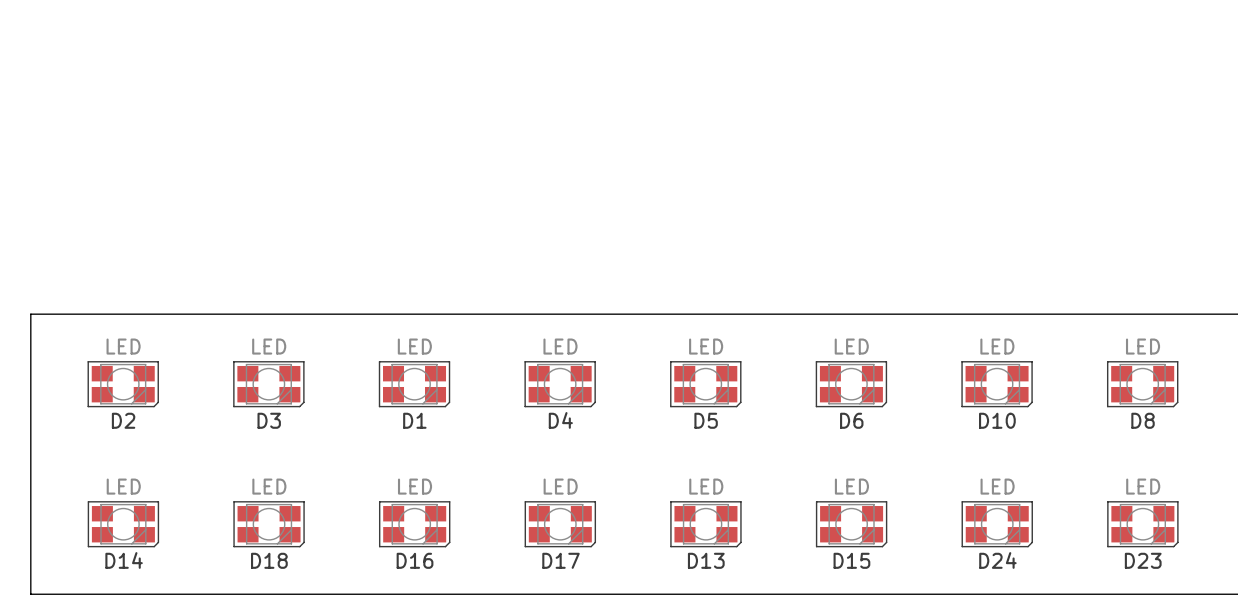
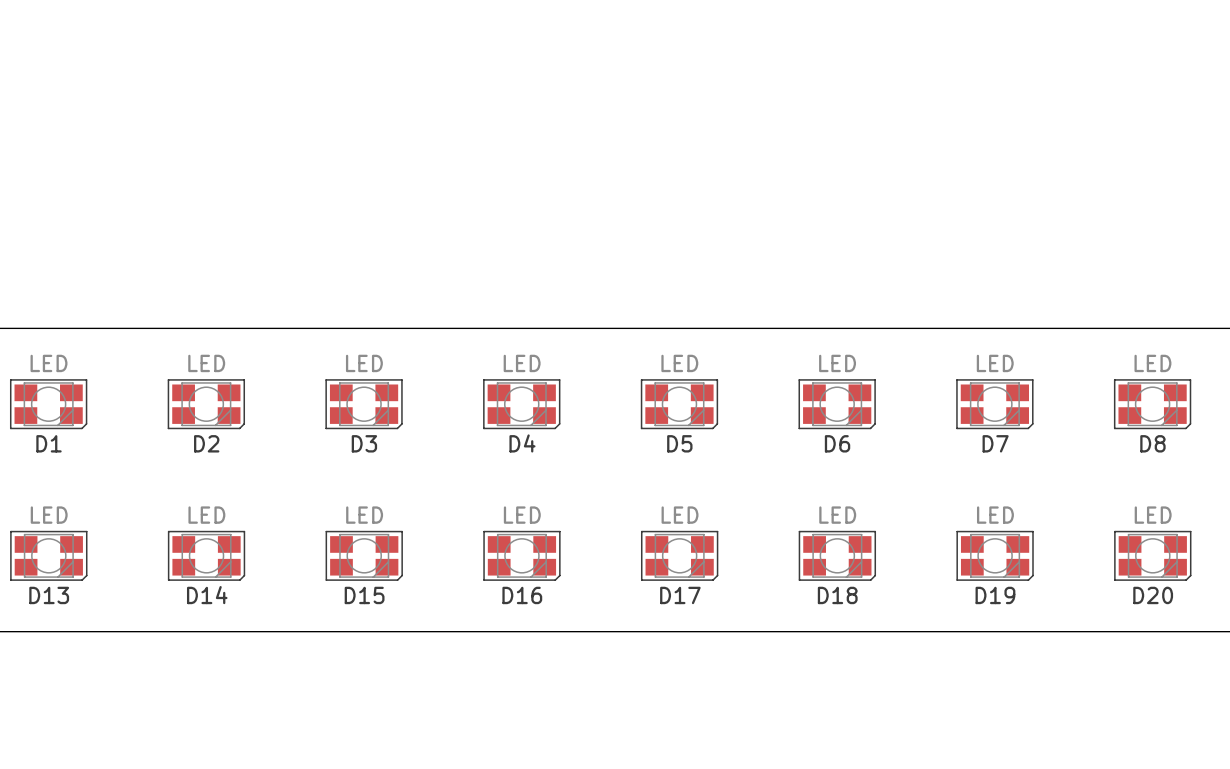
D2 name: D2 (123, 420) -> D1 (49, 443)
D3 name: D3 (269, 420) -> D2 (206, 443)
D1 name: D1 (414, 420) -> D3 (364, 443)
D10 name: D10 (997, 420) -> D7 (995, 443)
D14 name: D14 (124, 560) -> D13 (49, 595)
D18 name: D18 (269, 560) -> D14 (207, 595)
D16 name: D16 (415, 560) -> D15 (364, 595)
D17 name: D17 (560, 560) -> D16 (522, 595)
D13 name: D13 (706, 560) -> D17 (680, 595)
D15 name: D15 (851, 560) -> D18 (837, 595)
D24 name: D24 (997, 560) -> D19 (995, 595)
D23 name: D23 (1143, 560) -> D20 (1153, 595)

